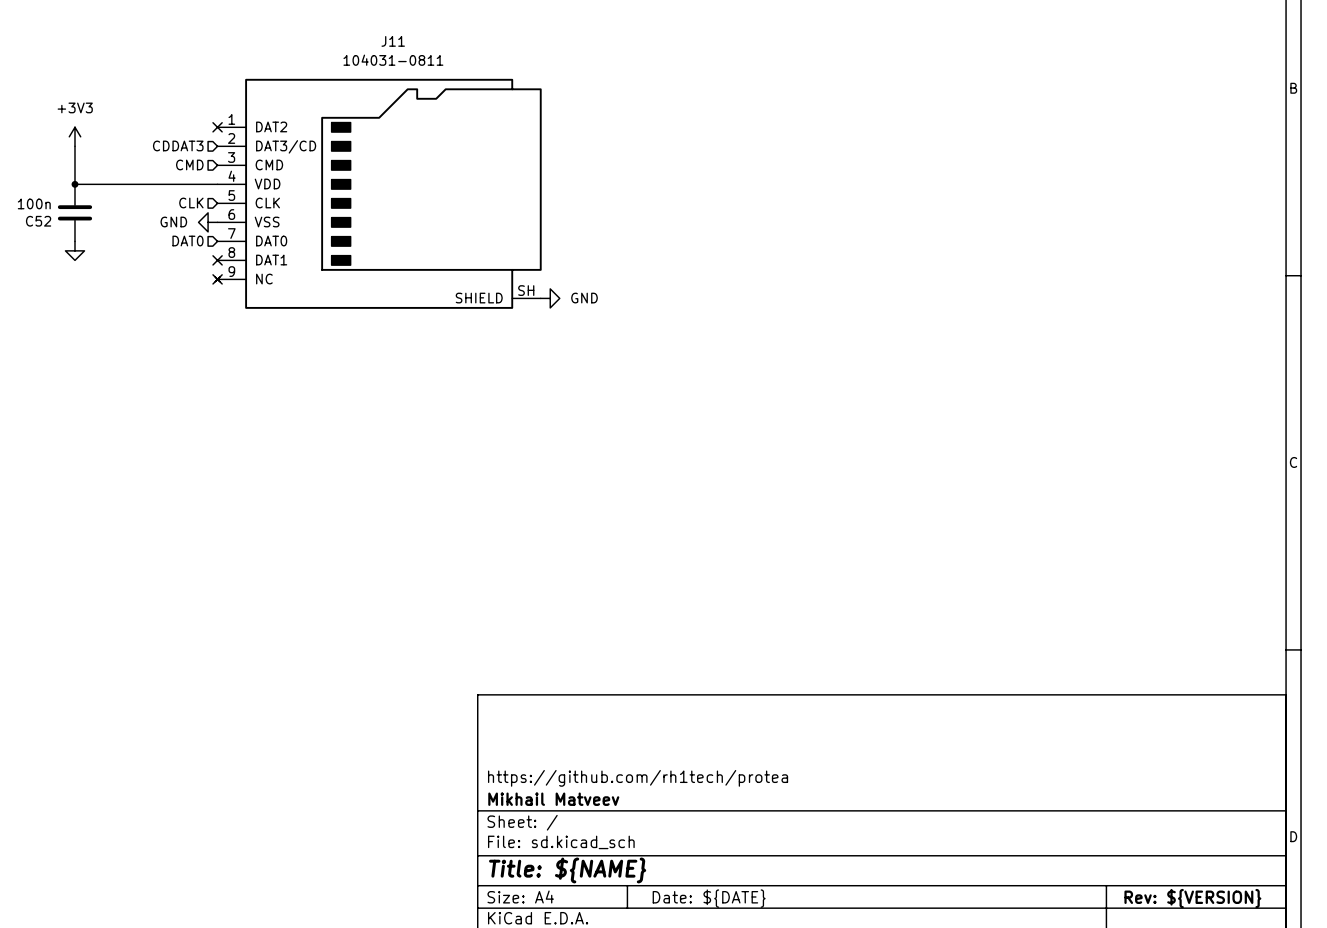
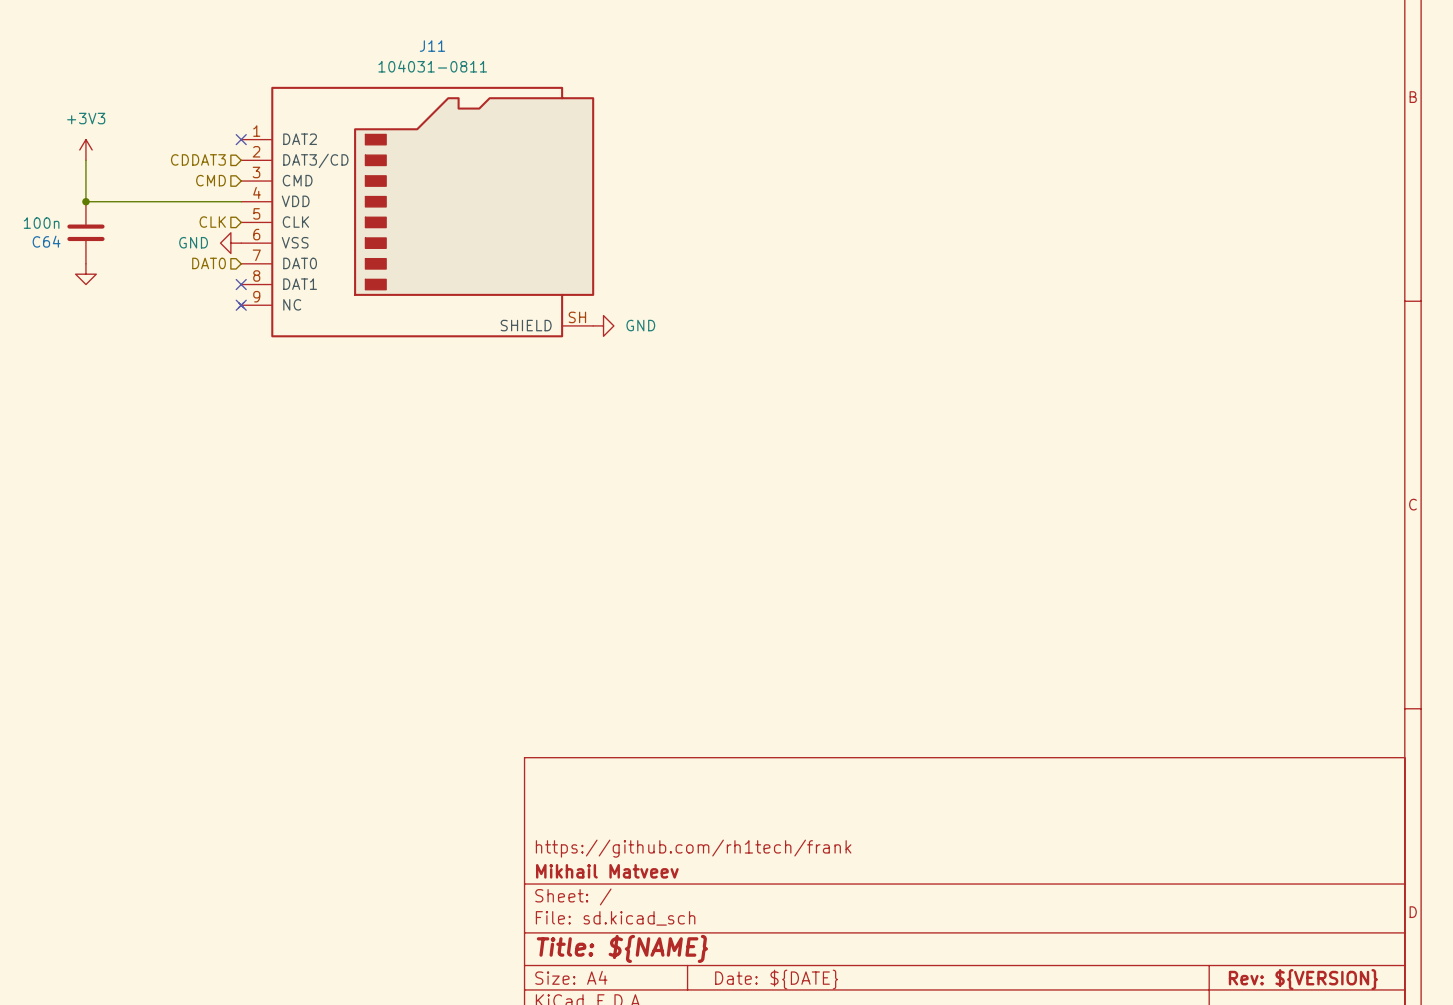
C52 name: C52 (38, 221) -> C64 (46, 241)
title block: https://github.com/rh1tech/protea (638, 778) -> https://github.com/rh1tech/frank (693, 848)

